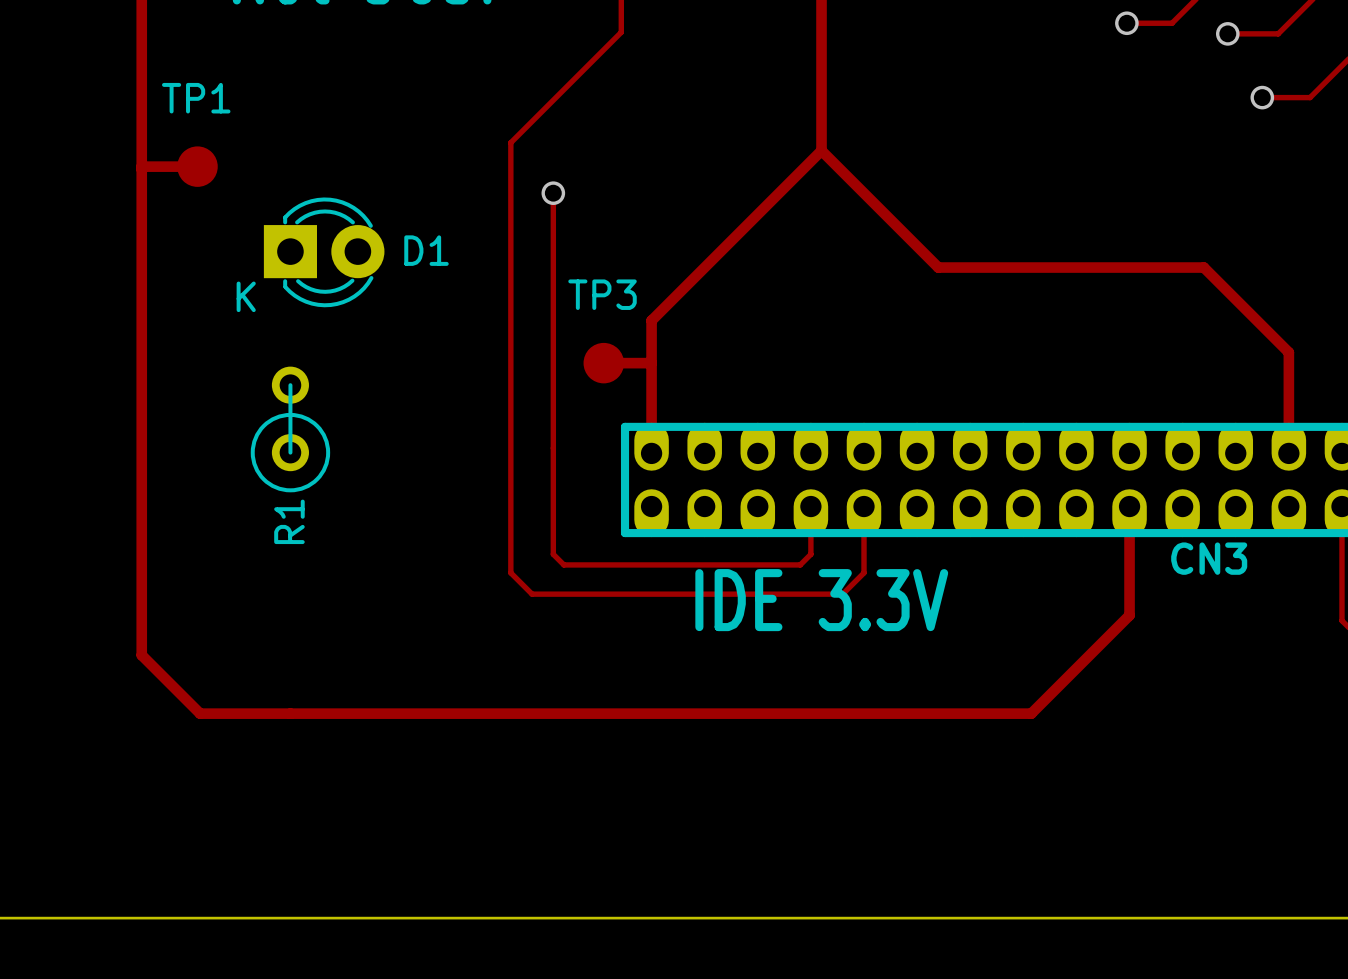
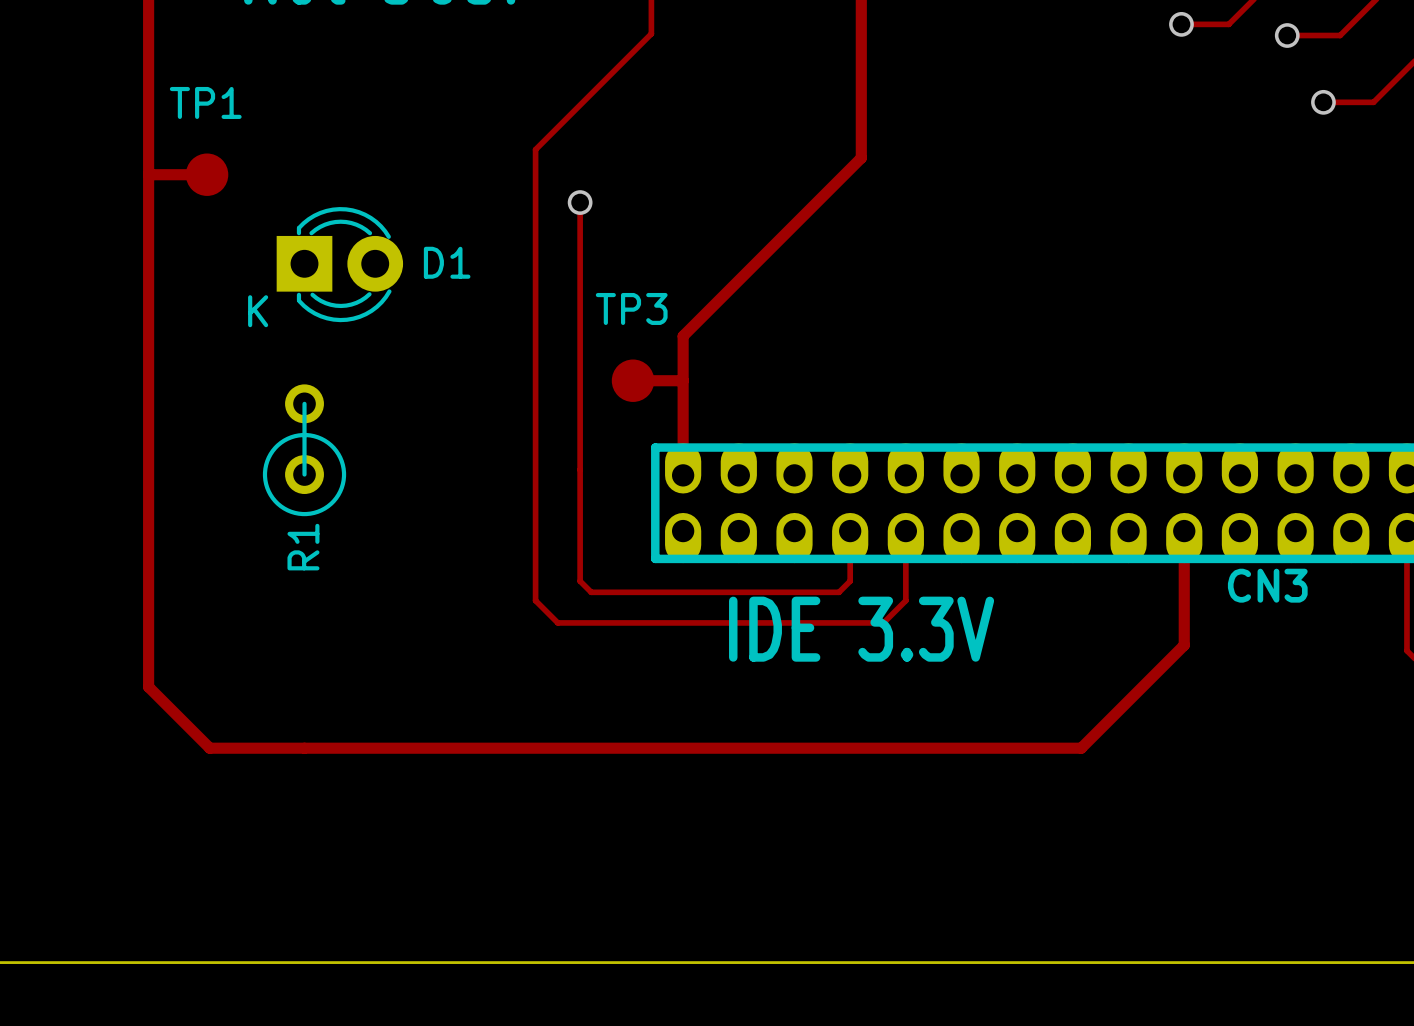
track: (821, 150) (938, 267) (1203, 267) (1288, 352) (1288, 453) -> none

